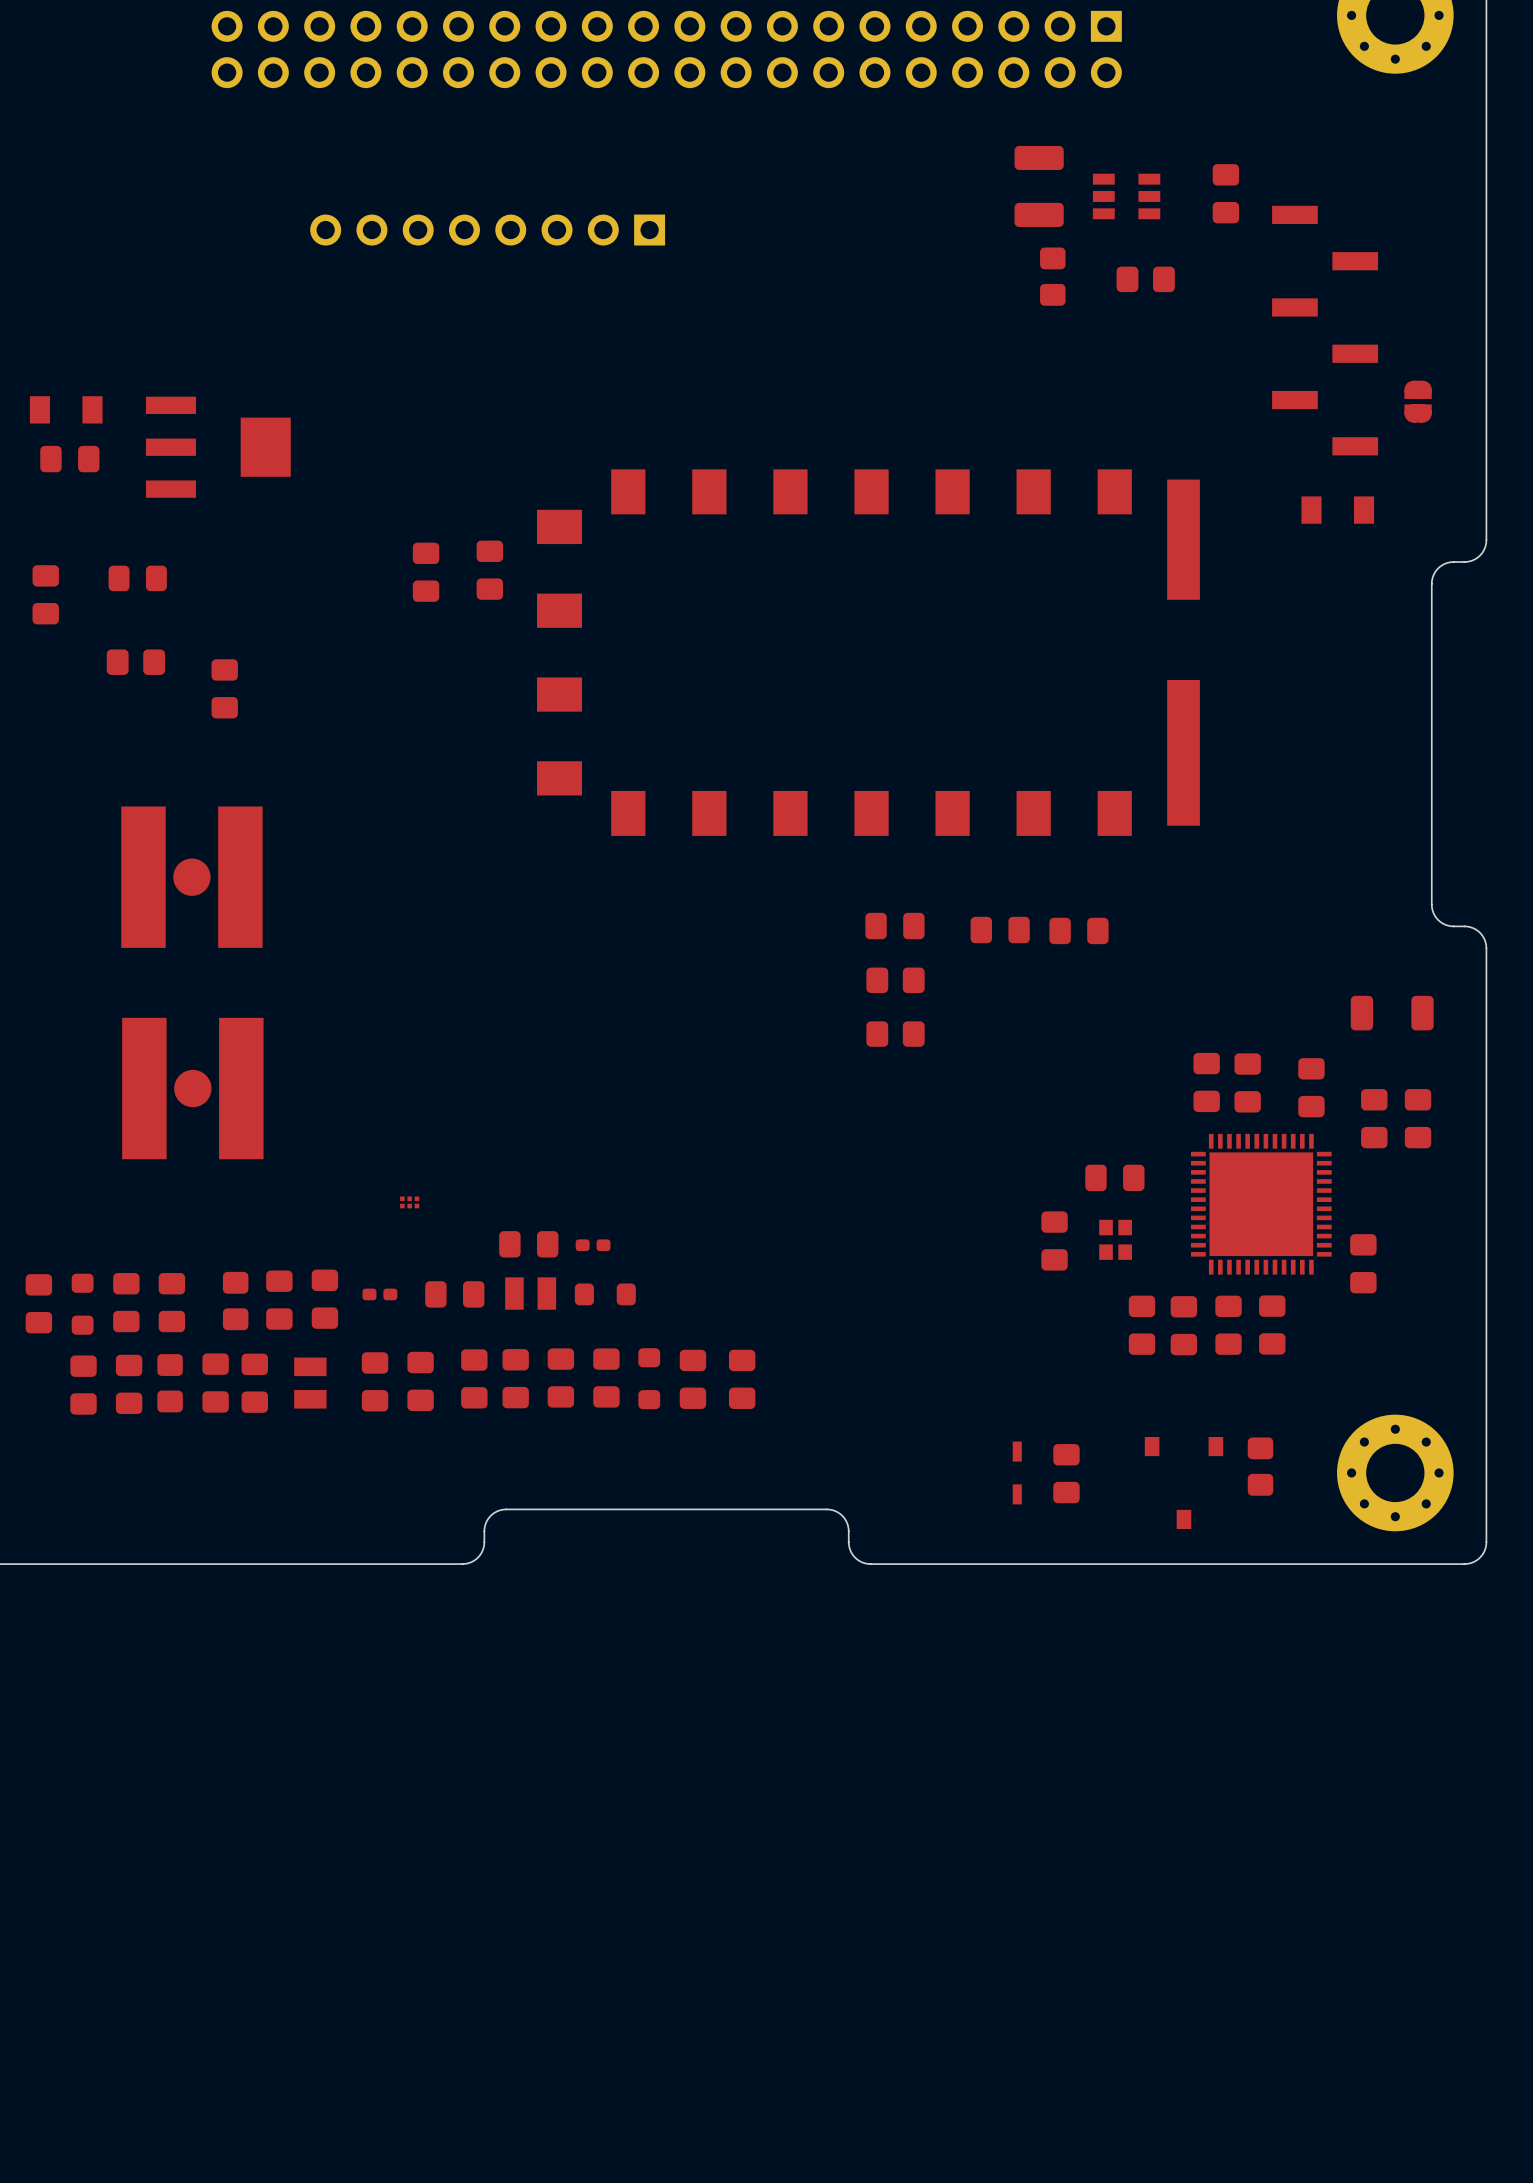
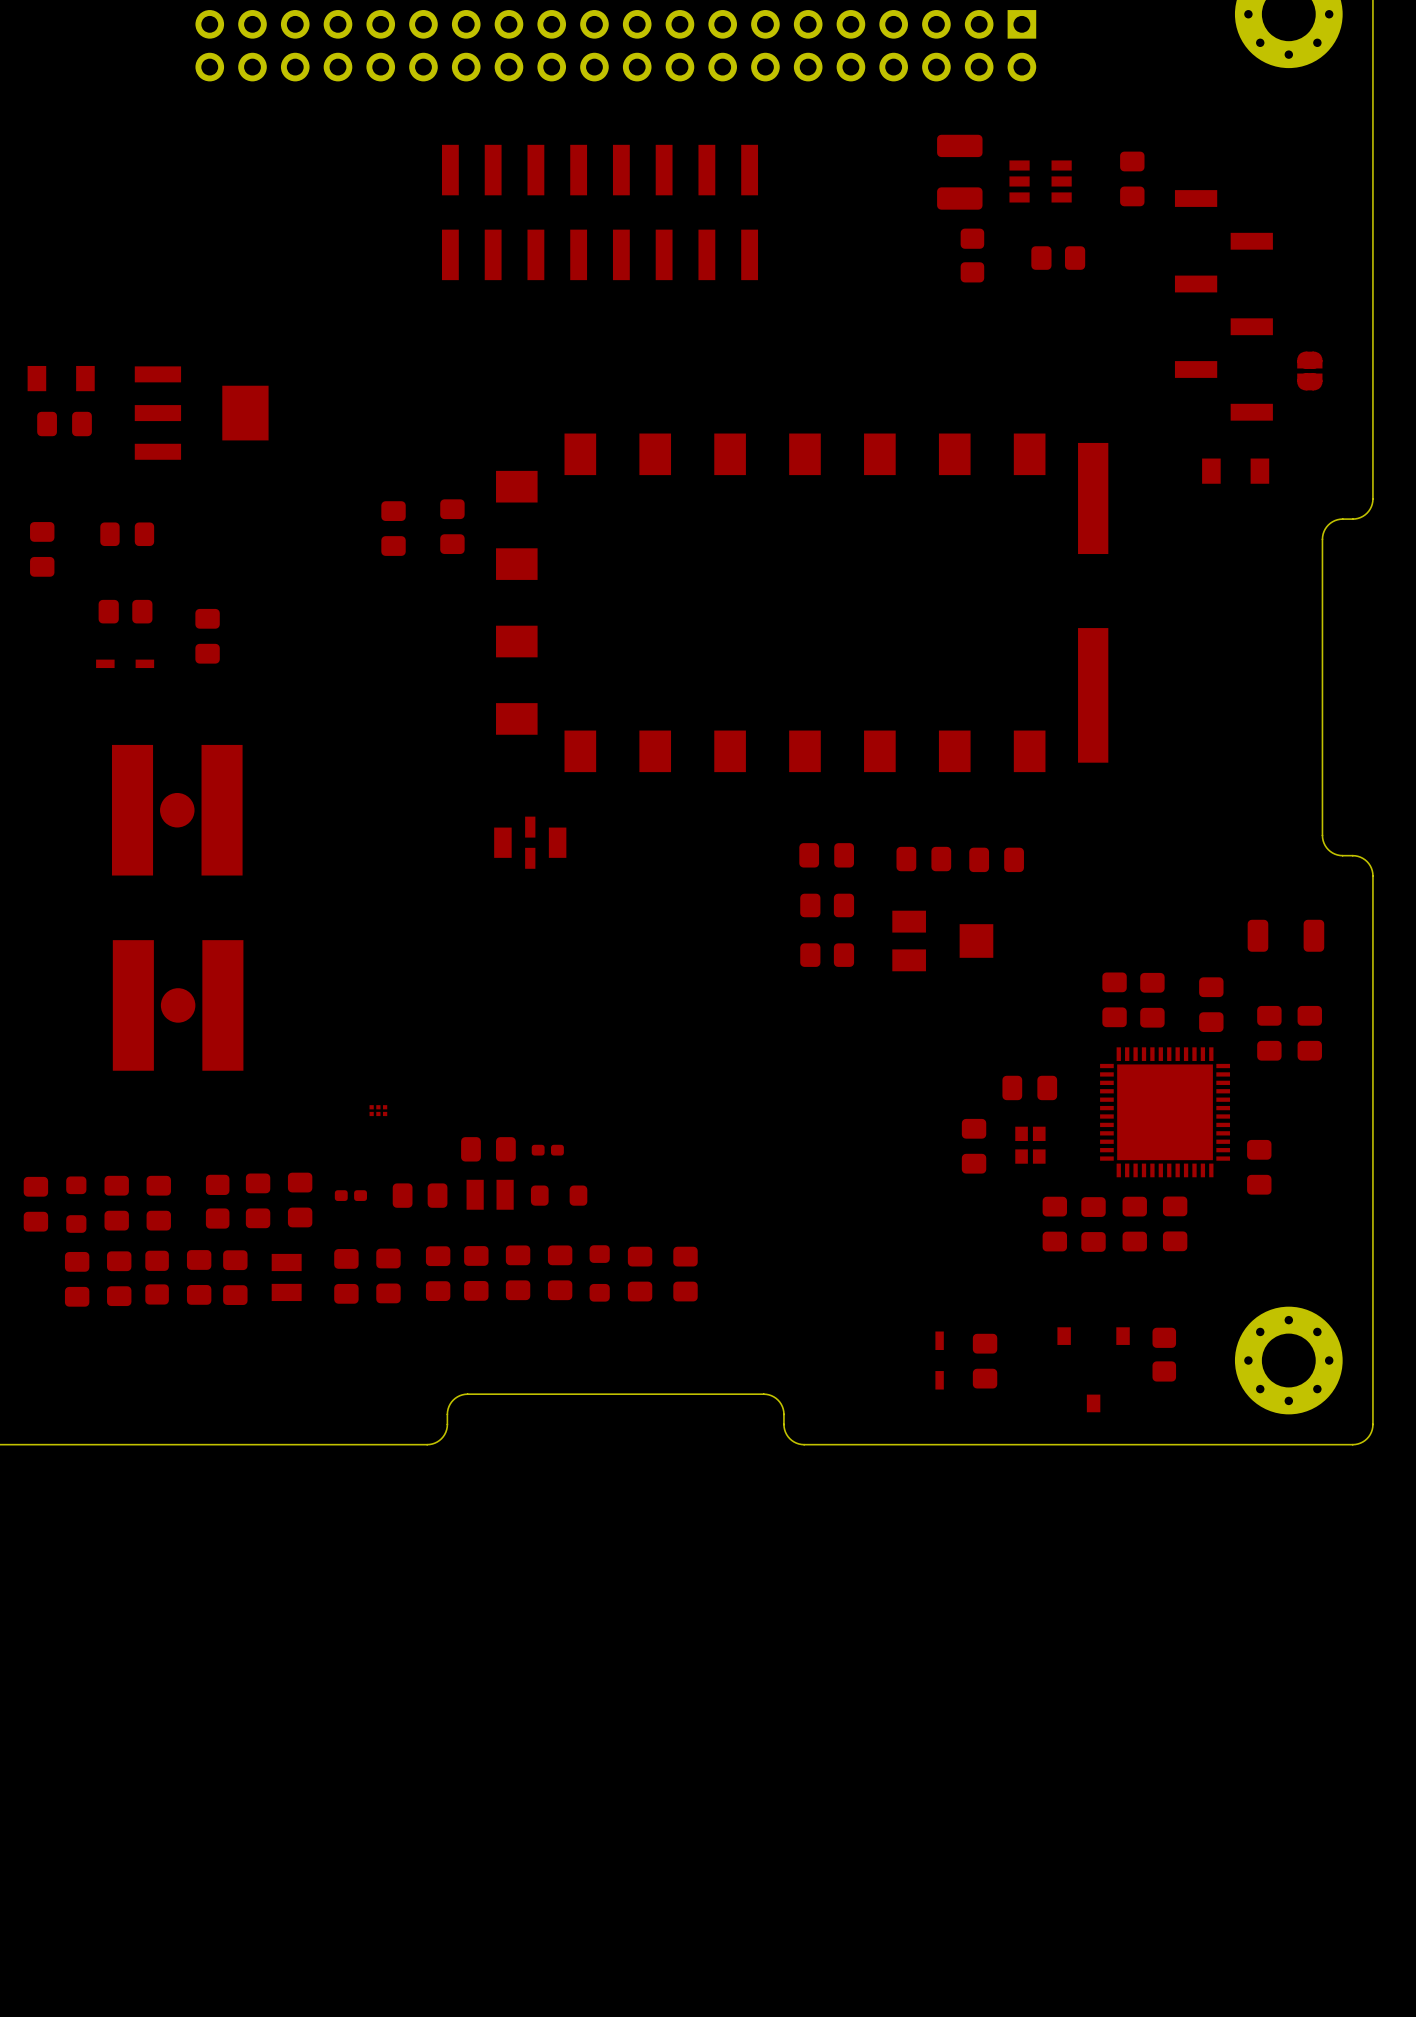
part: (487, 230) -> none
part: none -> (600, 212)
part: none -> (125, 663)
part: none -> (530, 842)
part: none -> (942, 940)

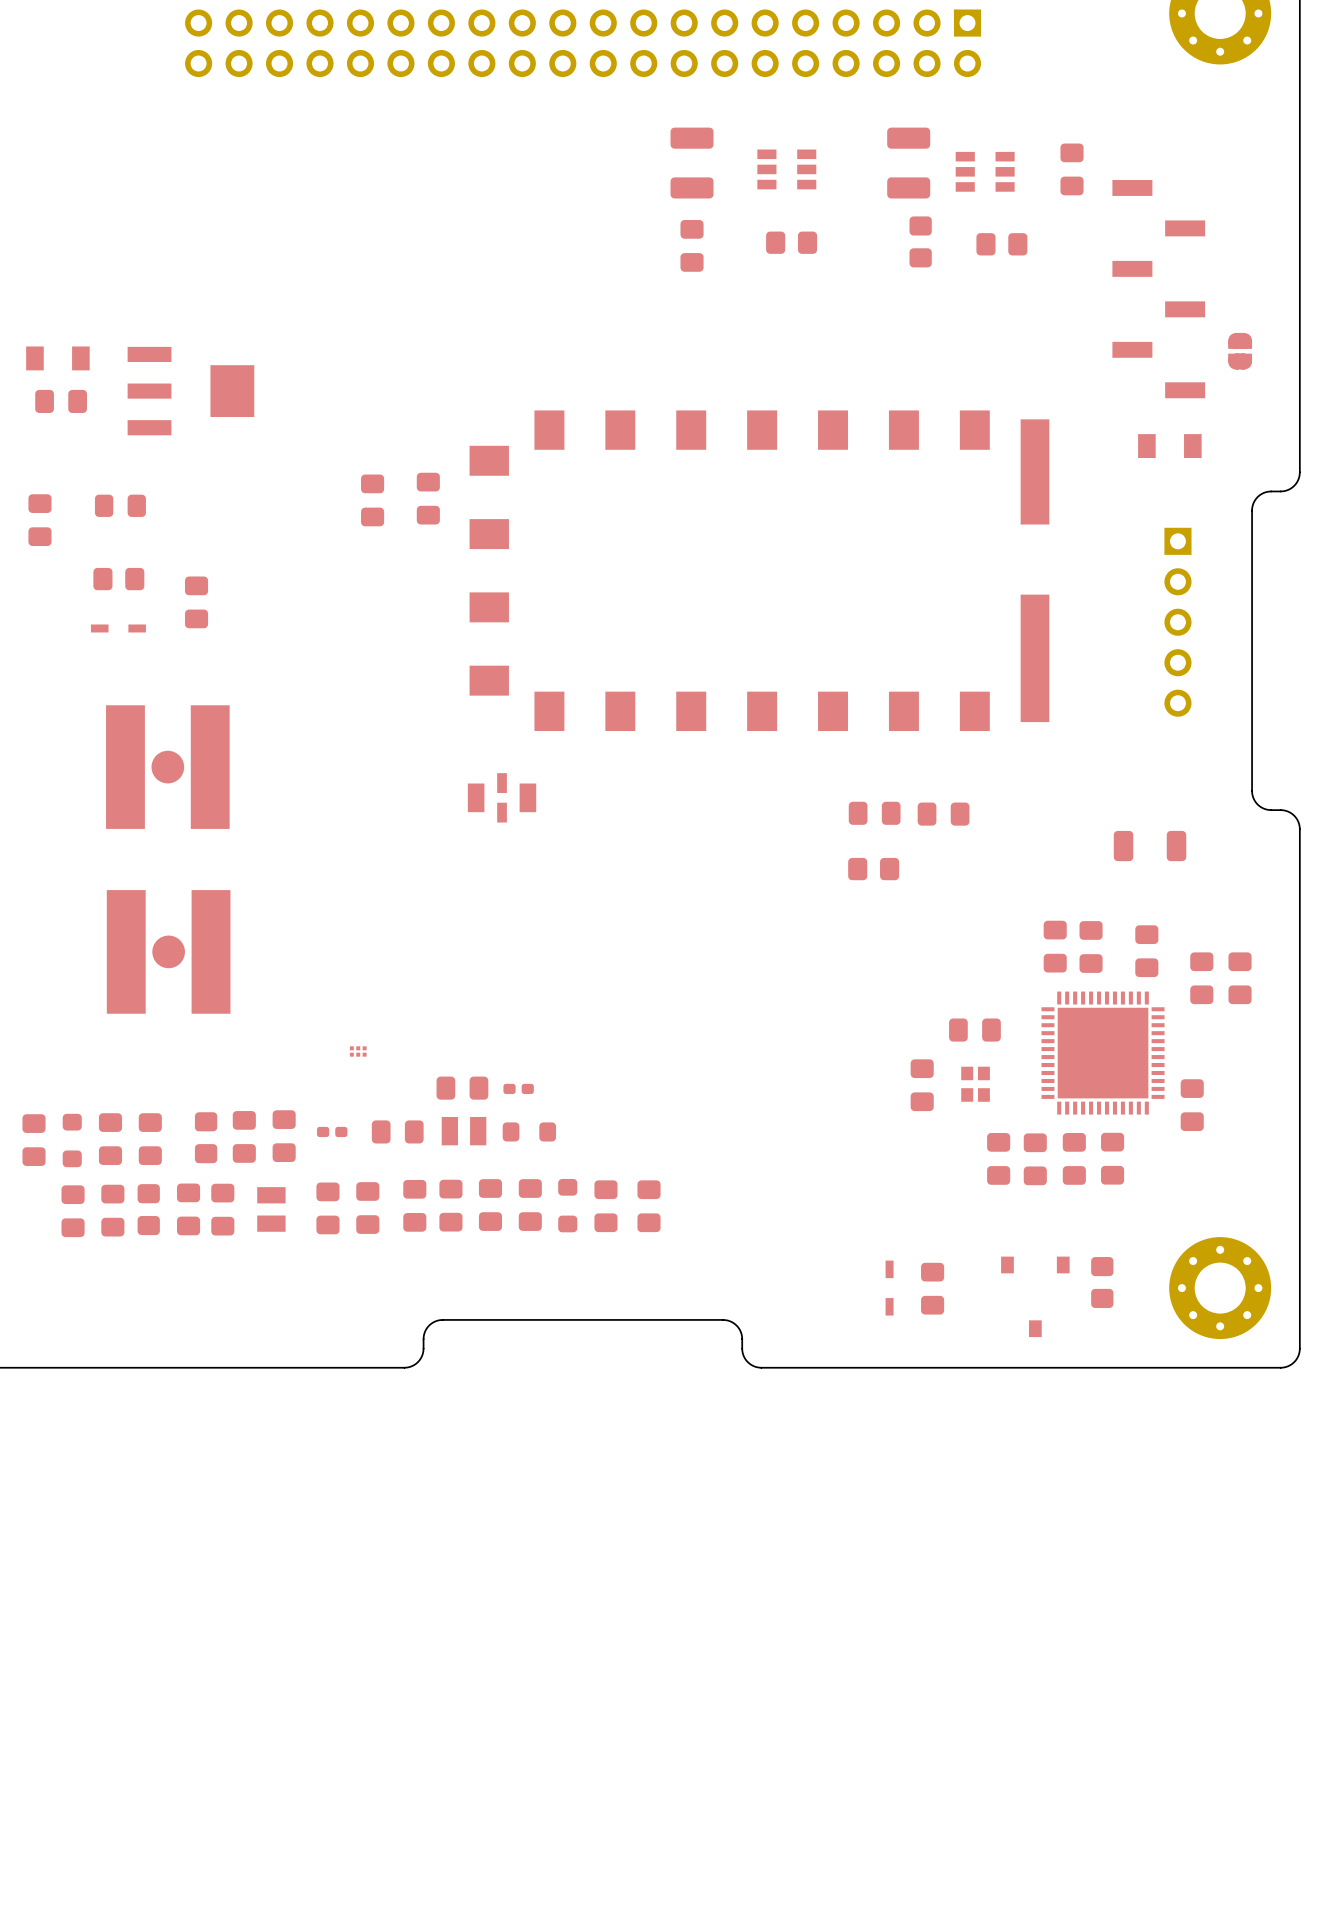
part: none -> (692, 163)
part: none -> (786, 169)
part: (600, 212) -> none
part: none -> (791, 242)
part: none -> (692, 245)
part: none -> (1177, 622)
part: (826, 855) -> none
part: (827, 905) -> none
part: none -> (873, 869)
part position: (1285, 935) -> (1150, 846)
part: (942, 940) -> none
part: (827, 955) -> none

